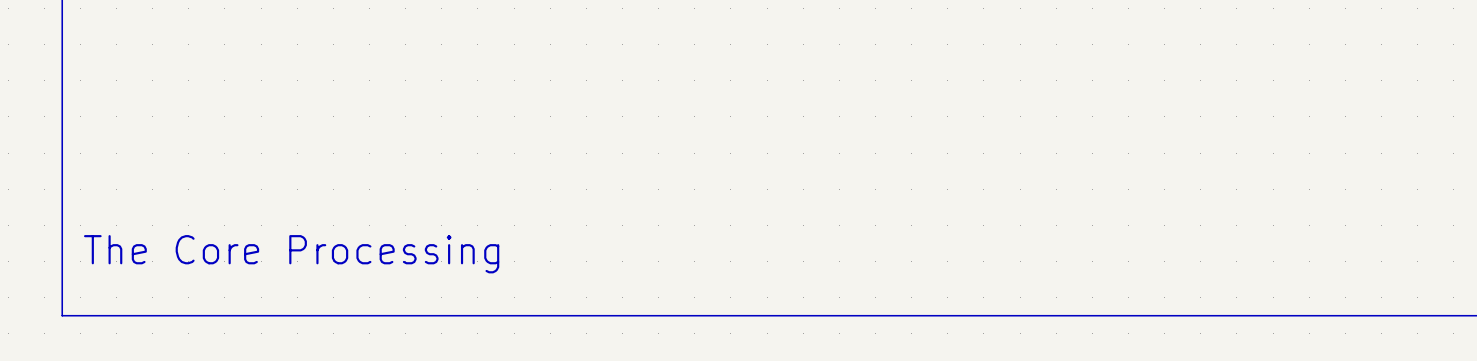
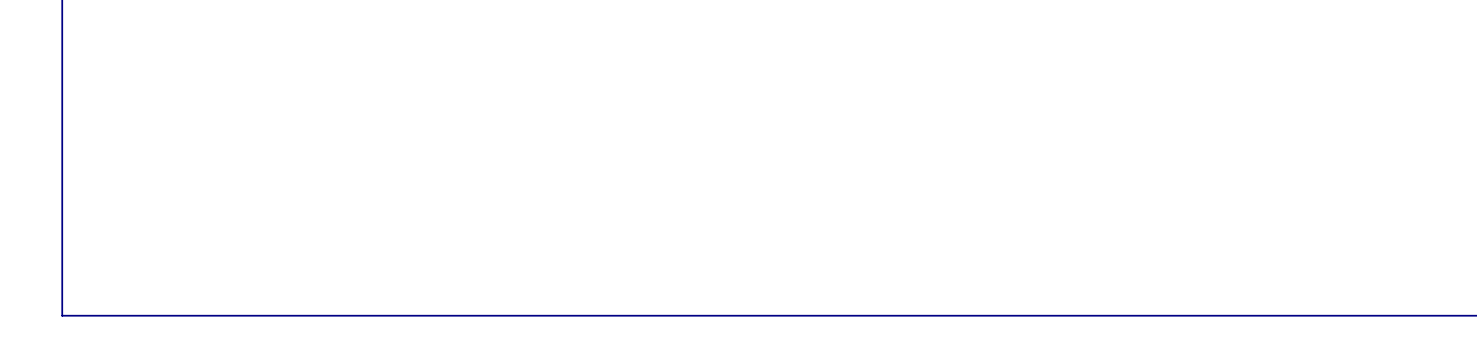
text: The Core Processing (291, 254) -> none

